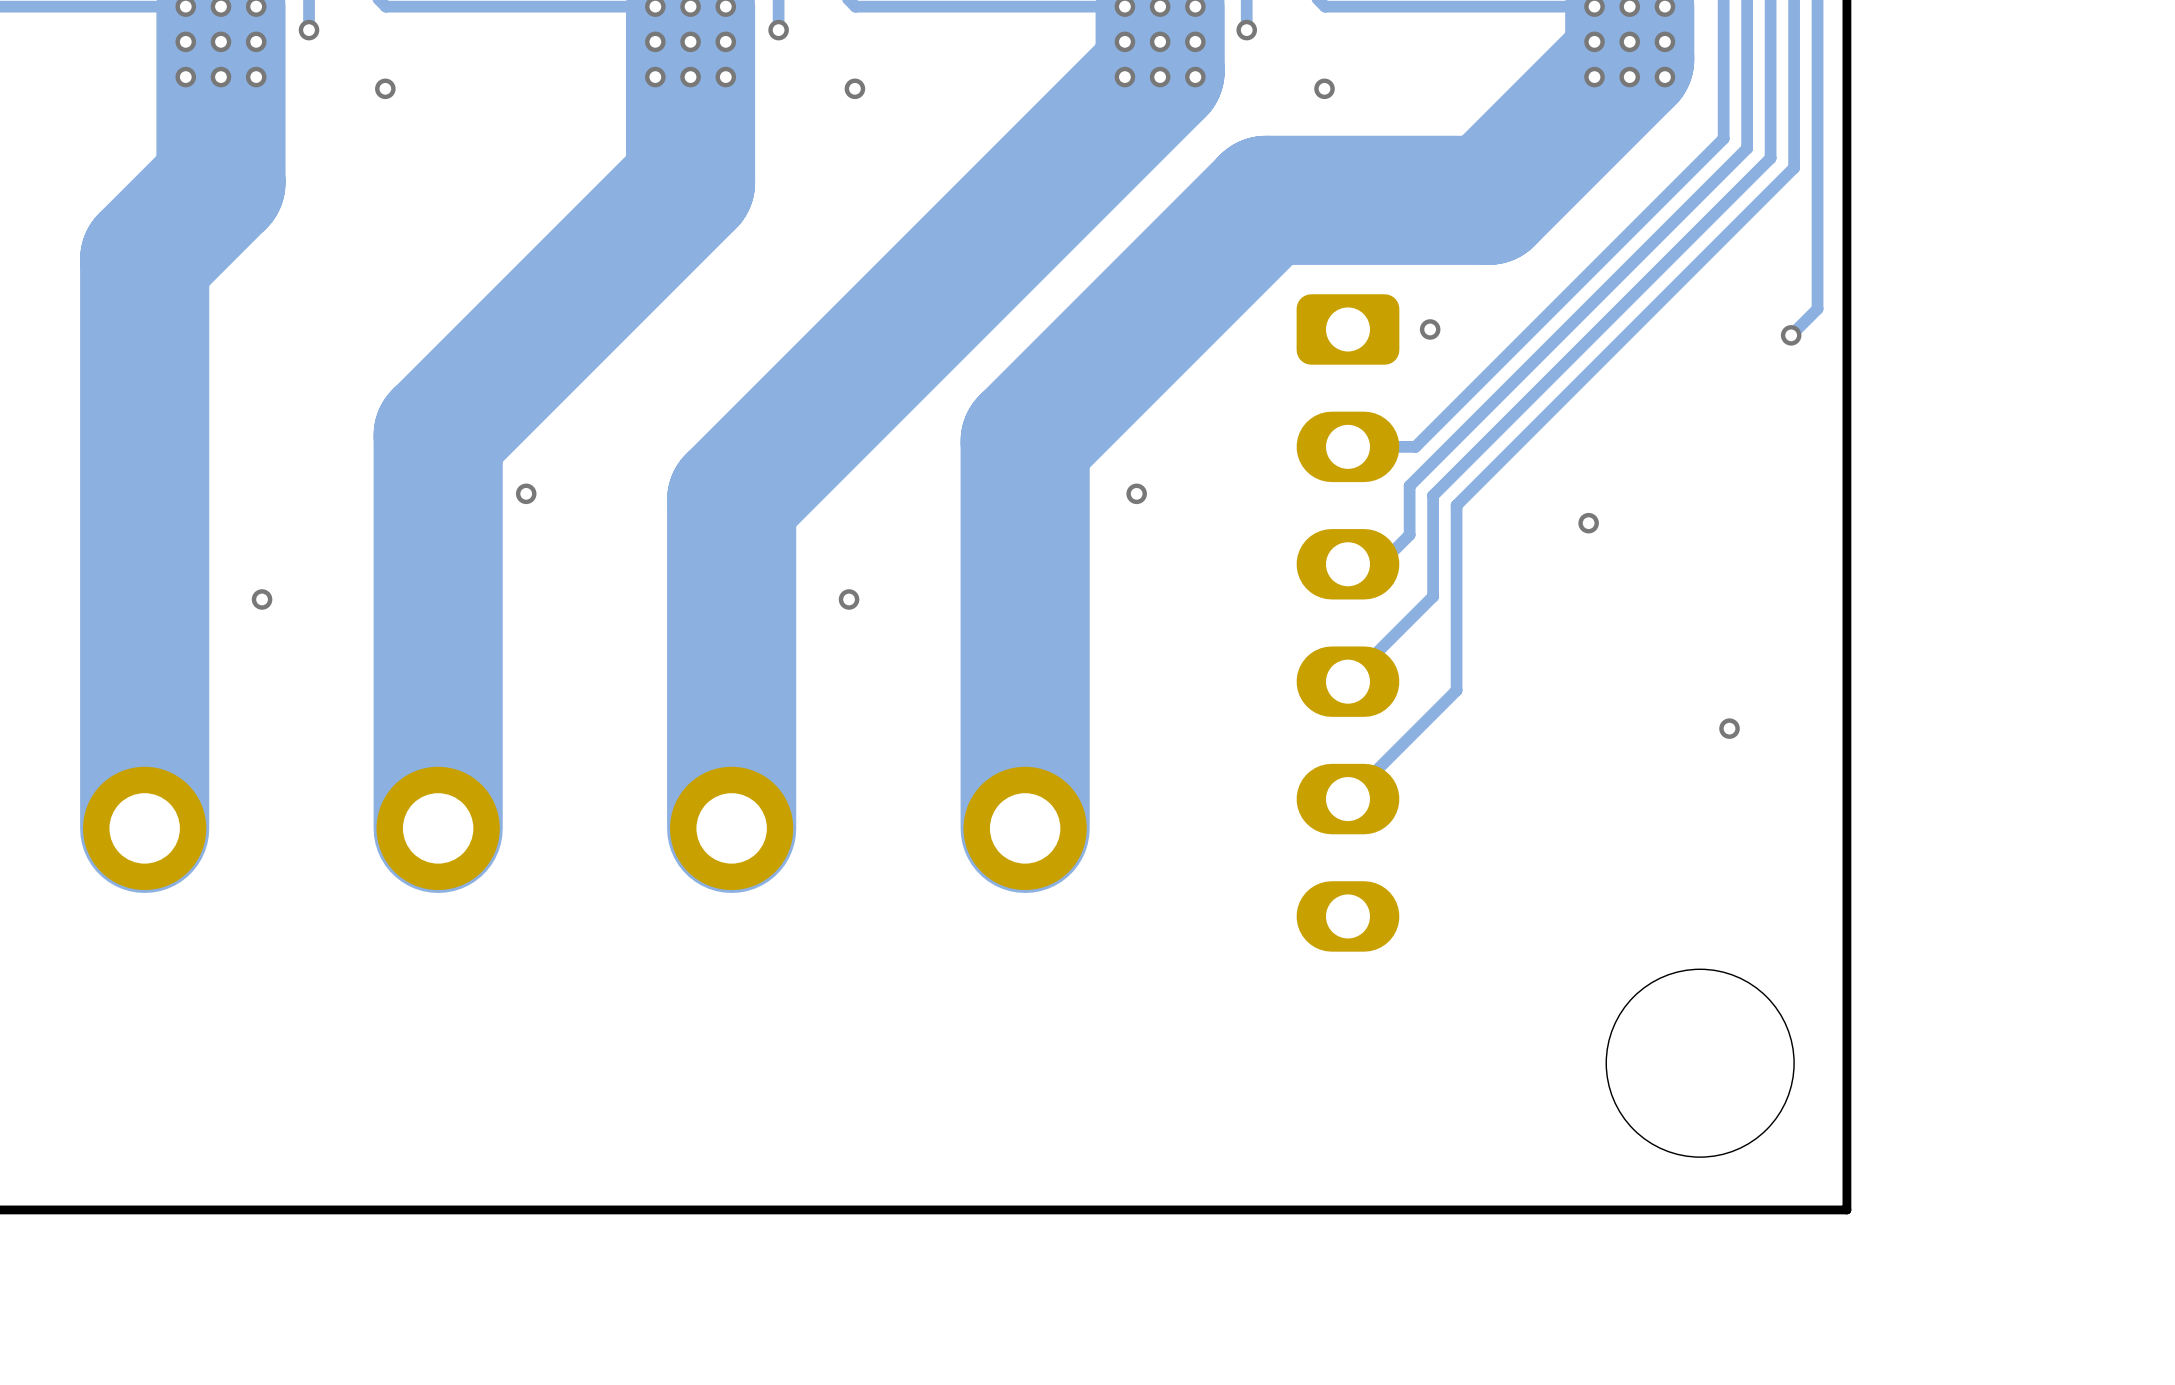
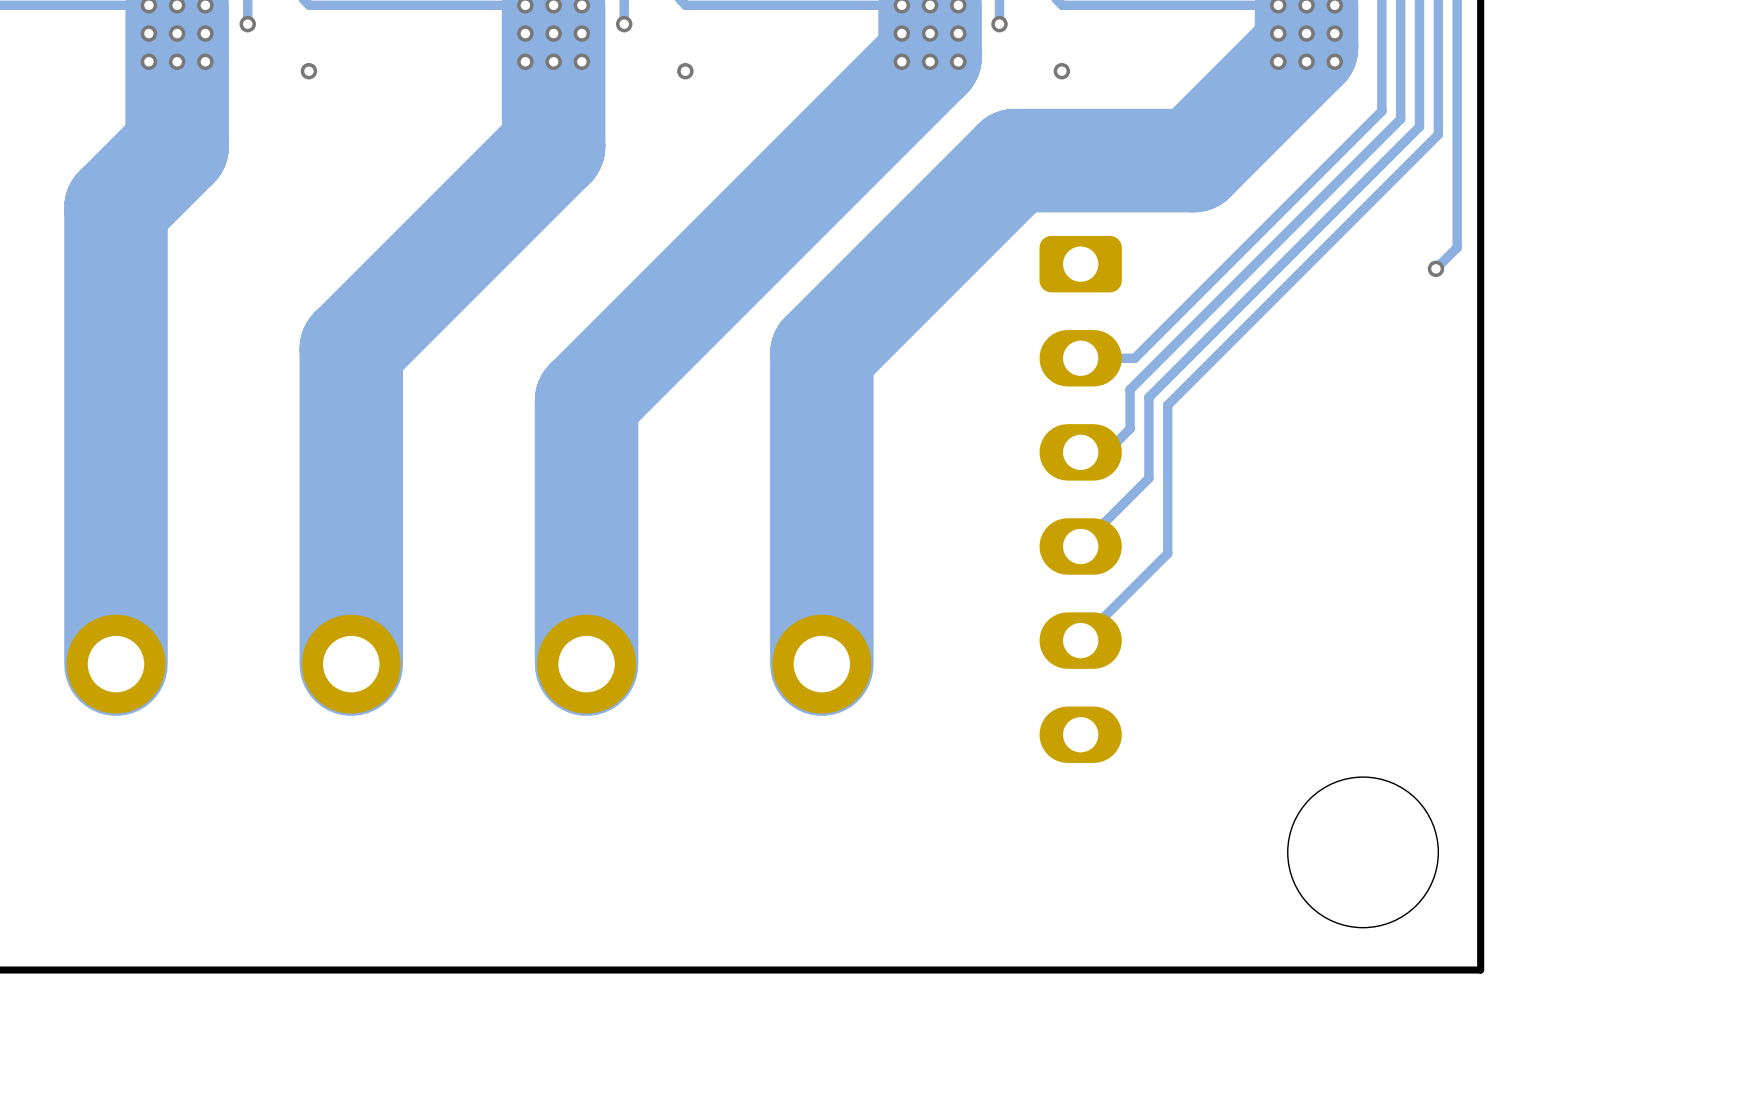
via: (1430, 329) -> none
via: (526, 493) -> none
via: (1136, 493) -> none
via: (1588, 523) -> none
via: (262, 599) -> none
via: (849, 599) -> none
via: (1729, 728) -> none

